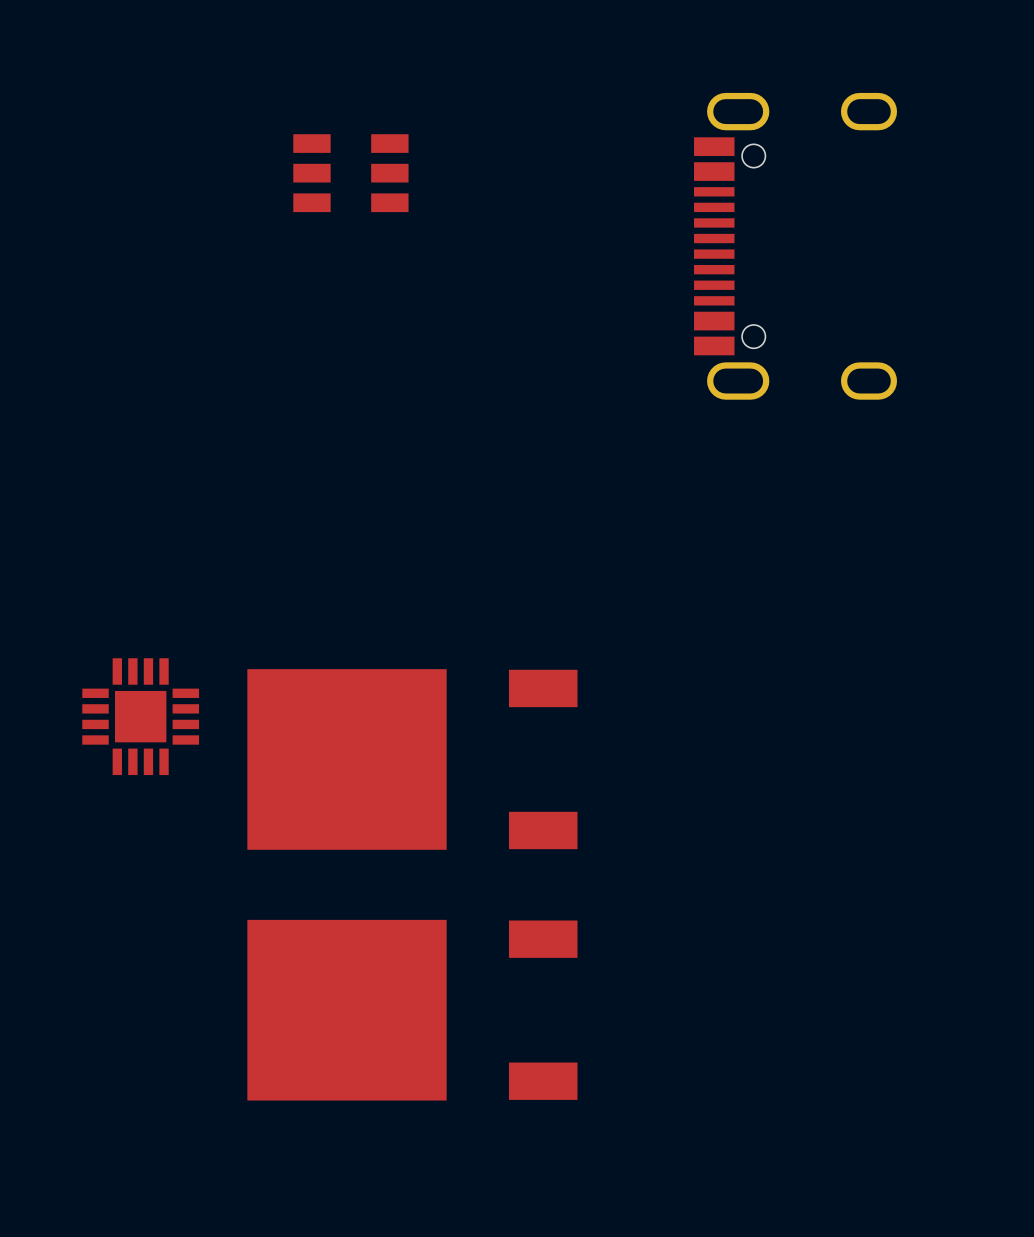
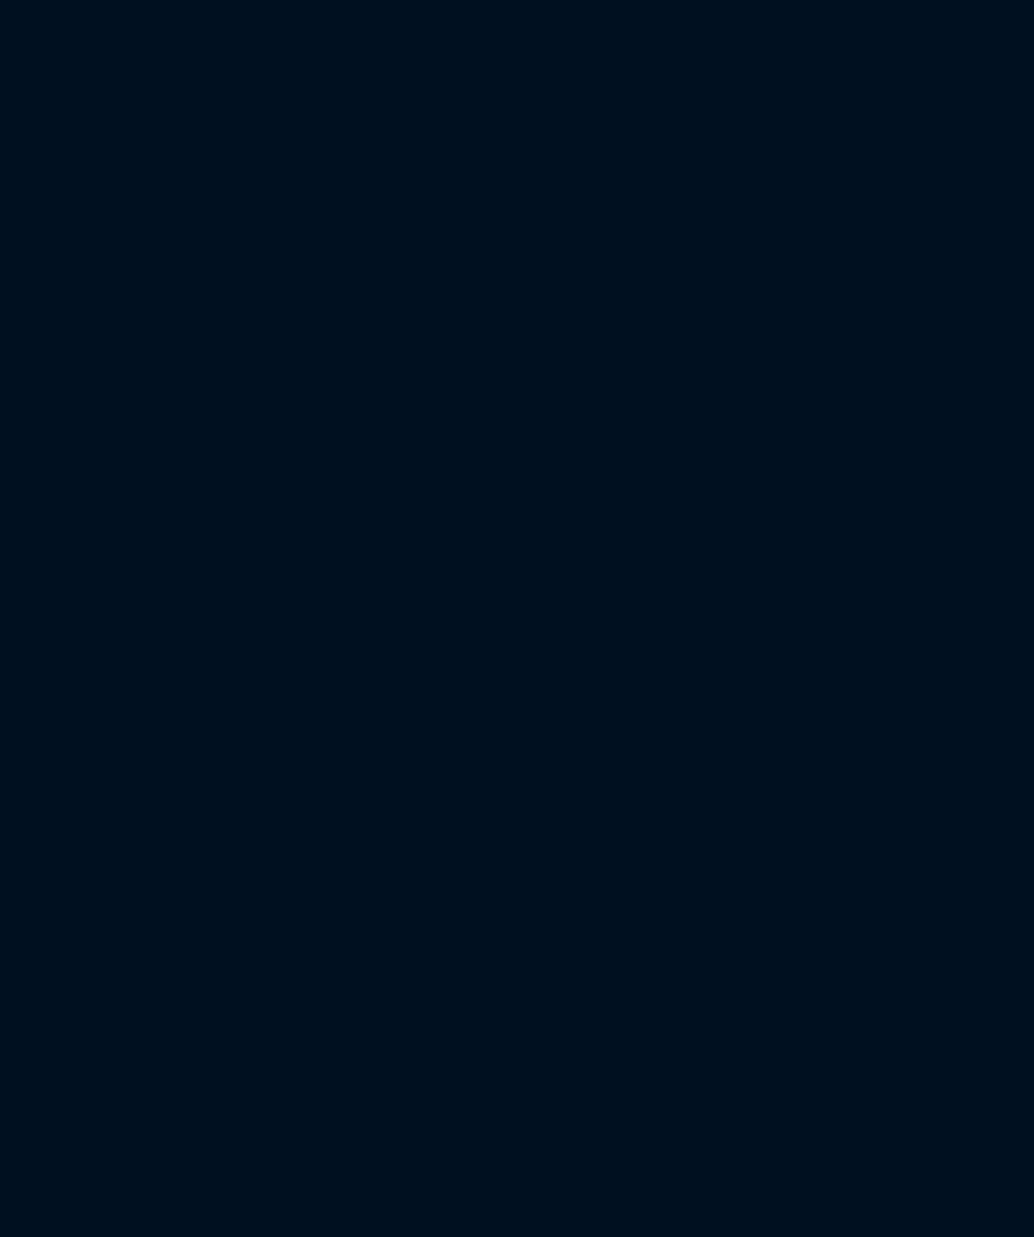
part: (350, 173) -> none
part: (795, 246) -> none
part: (140, 716) -> none
part: (412, 759) -> none
part: (412, 1010) -> none

